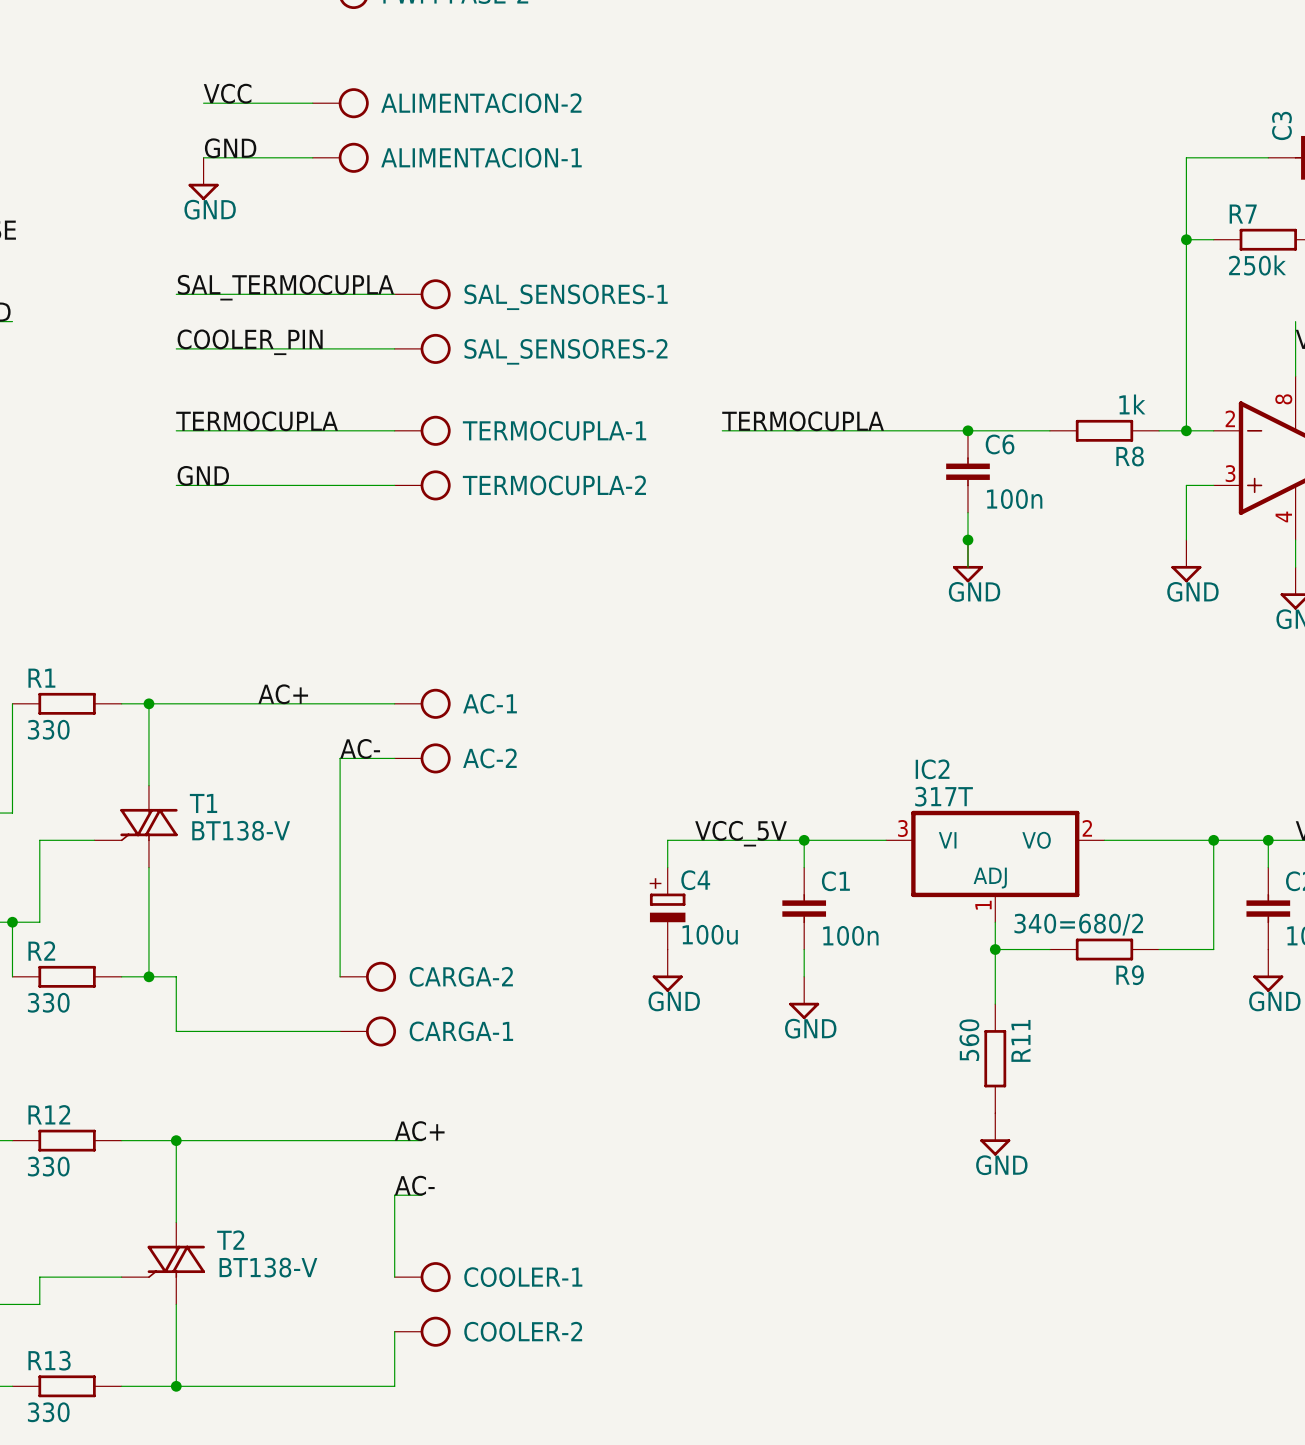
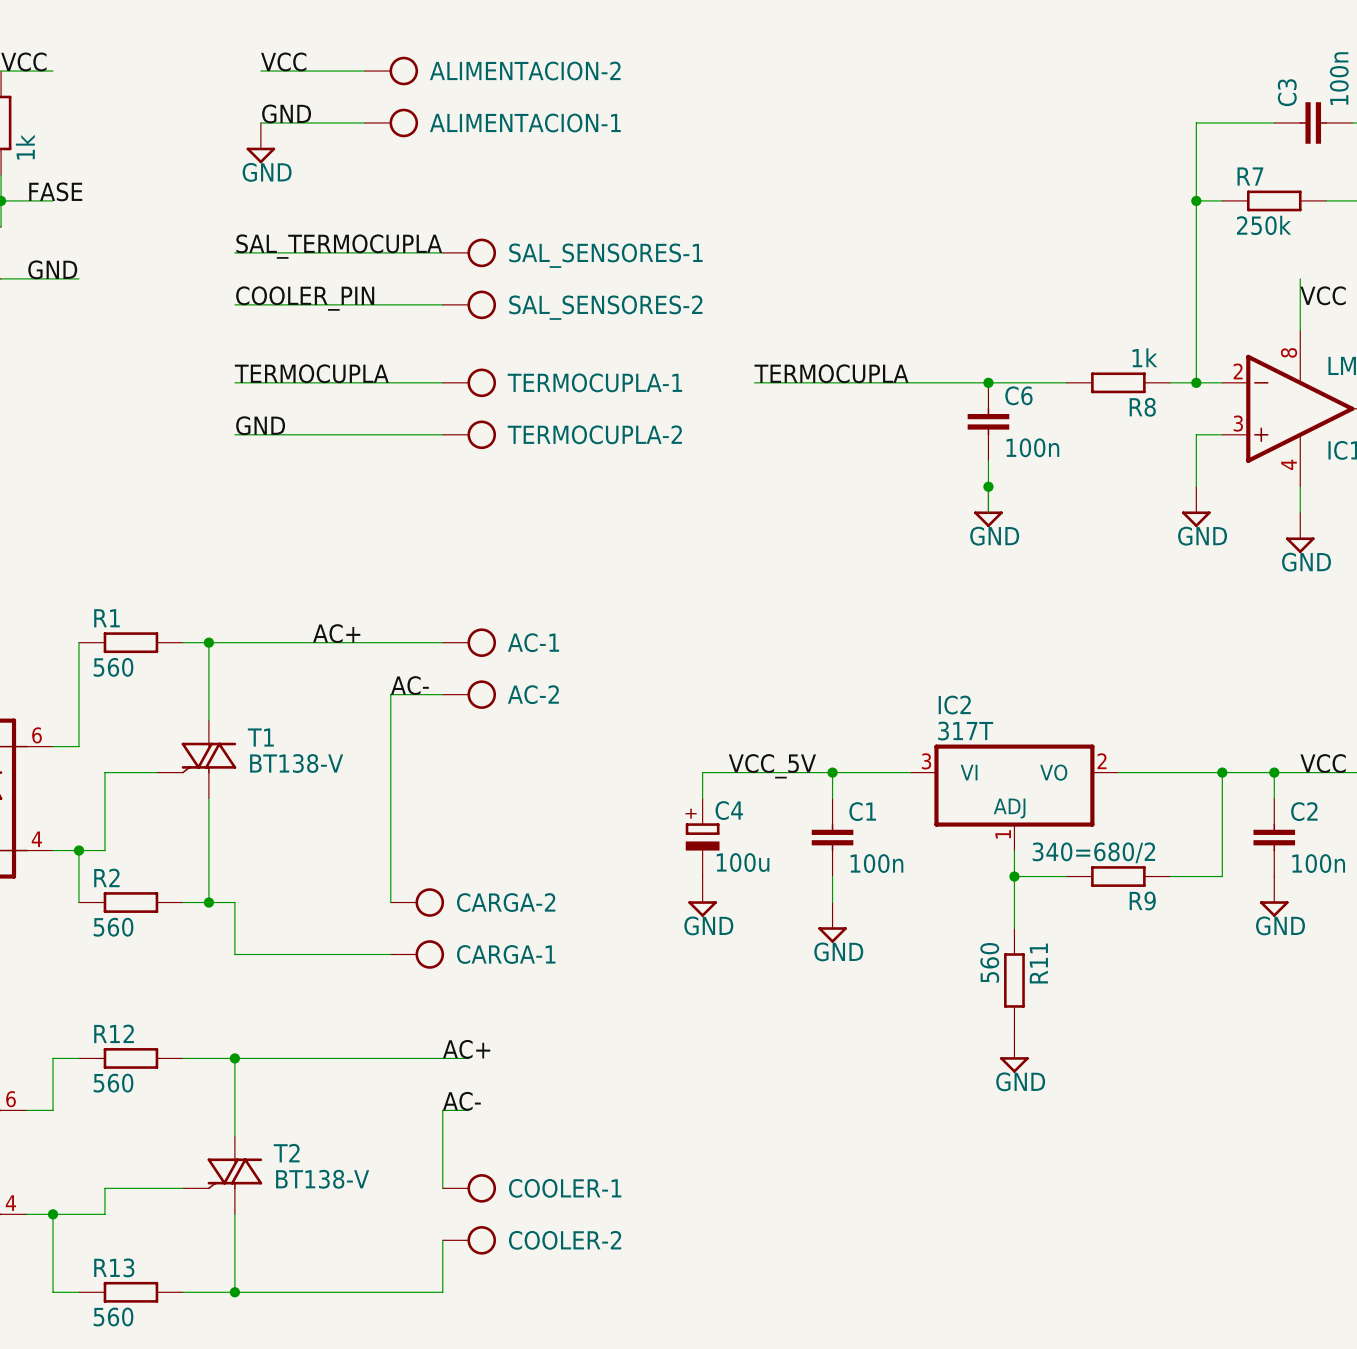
R1 value: 330 (48, 729) -> 560 (113, 667)
R2 value: 330 (48, 1002) -> 560 (113, 927)
R12 value: 330 (48, 1166) -> 560 (113, 1083)
R13 value: 330 (48, 1412) -> 560 (113, 1316)

